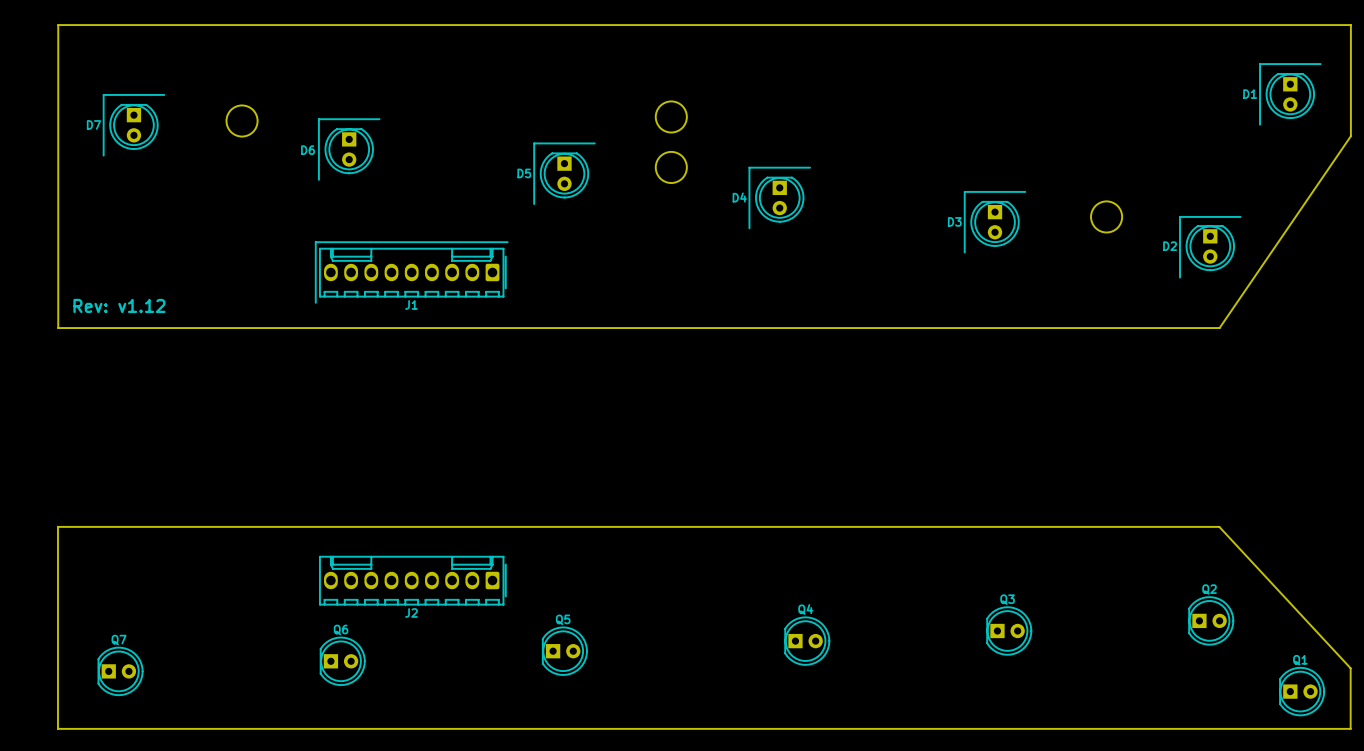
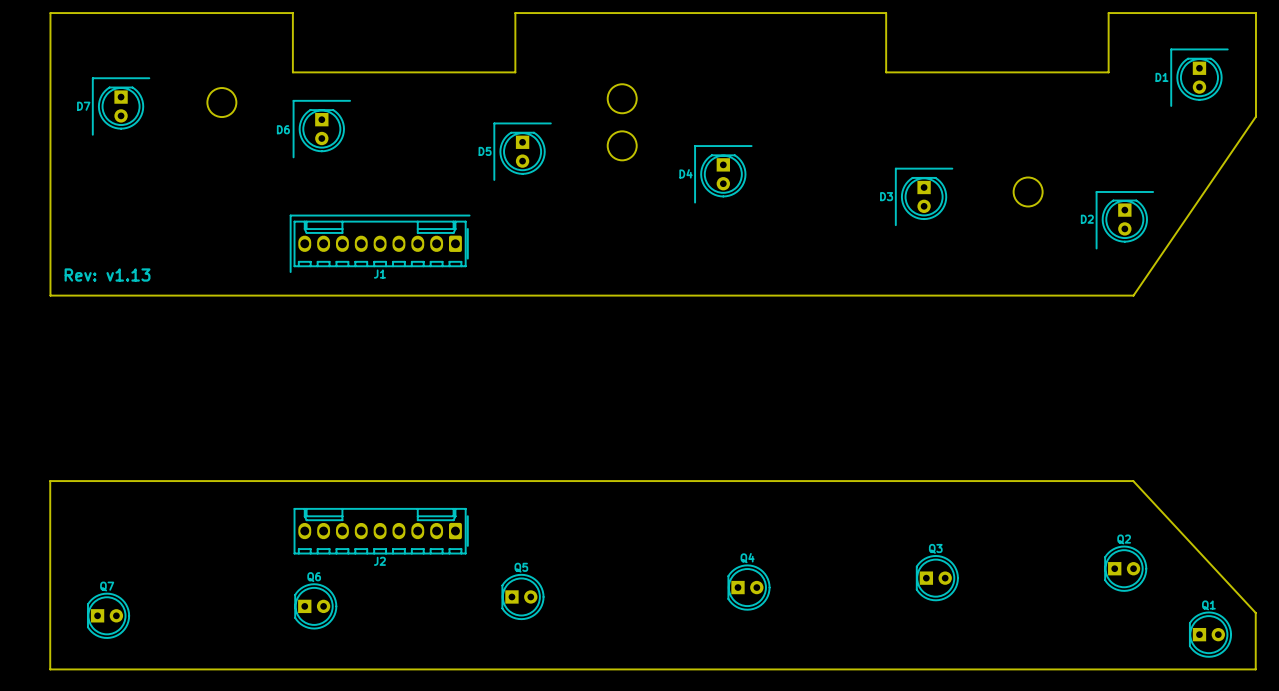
board edge: (318, 25) (556, 25) -> (292, 13) (292, 72) (515, 72) (515, 13)
board edge: (954, 25) (1192, 25) -> (886, 13) (886, 72) (1108, 72) (1108, 13)
text: Rev: v1.12 (119, 305) -> Rev: v1.13 (107, 275)

